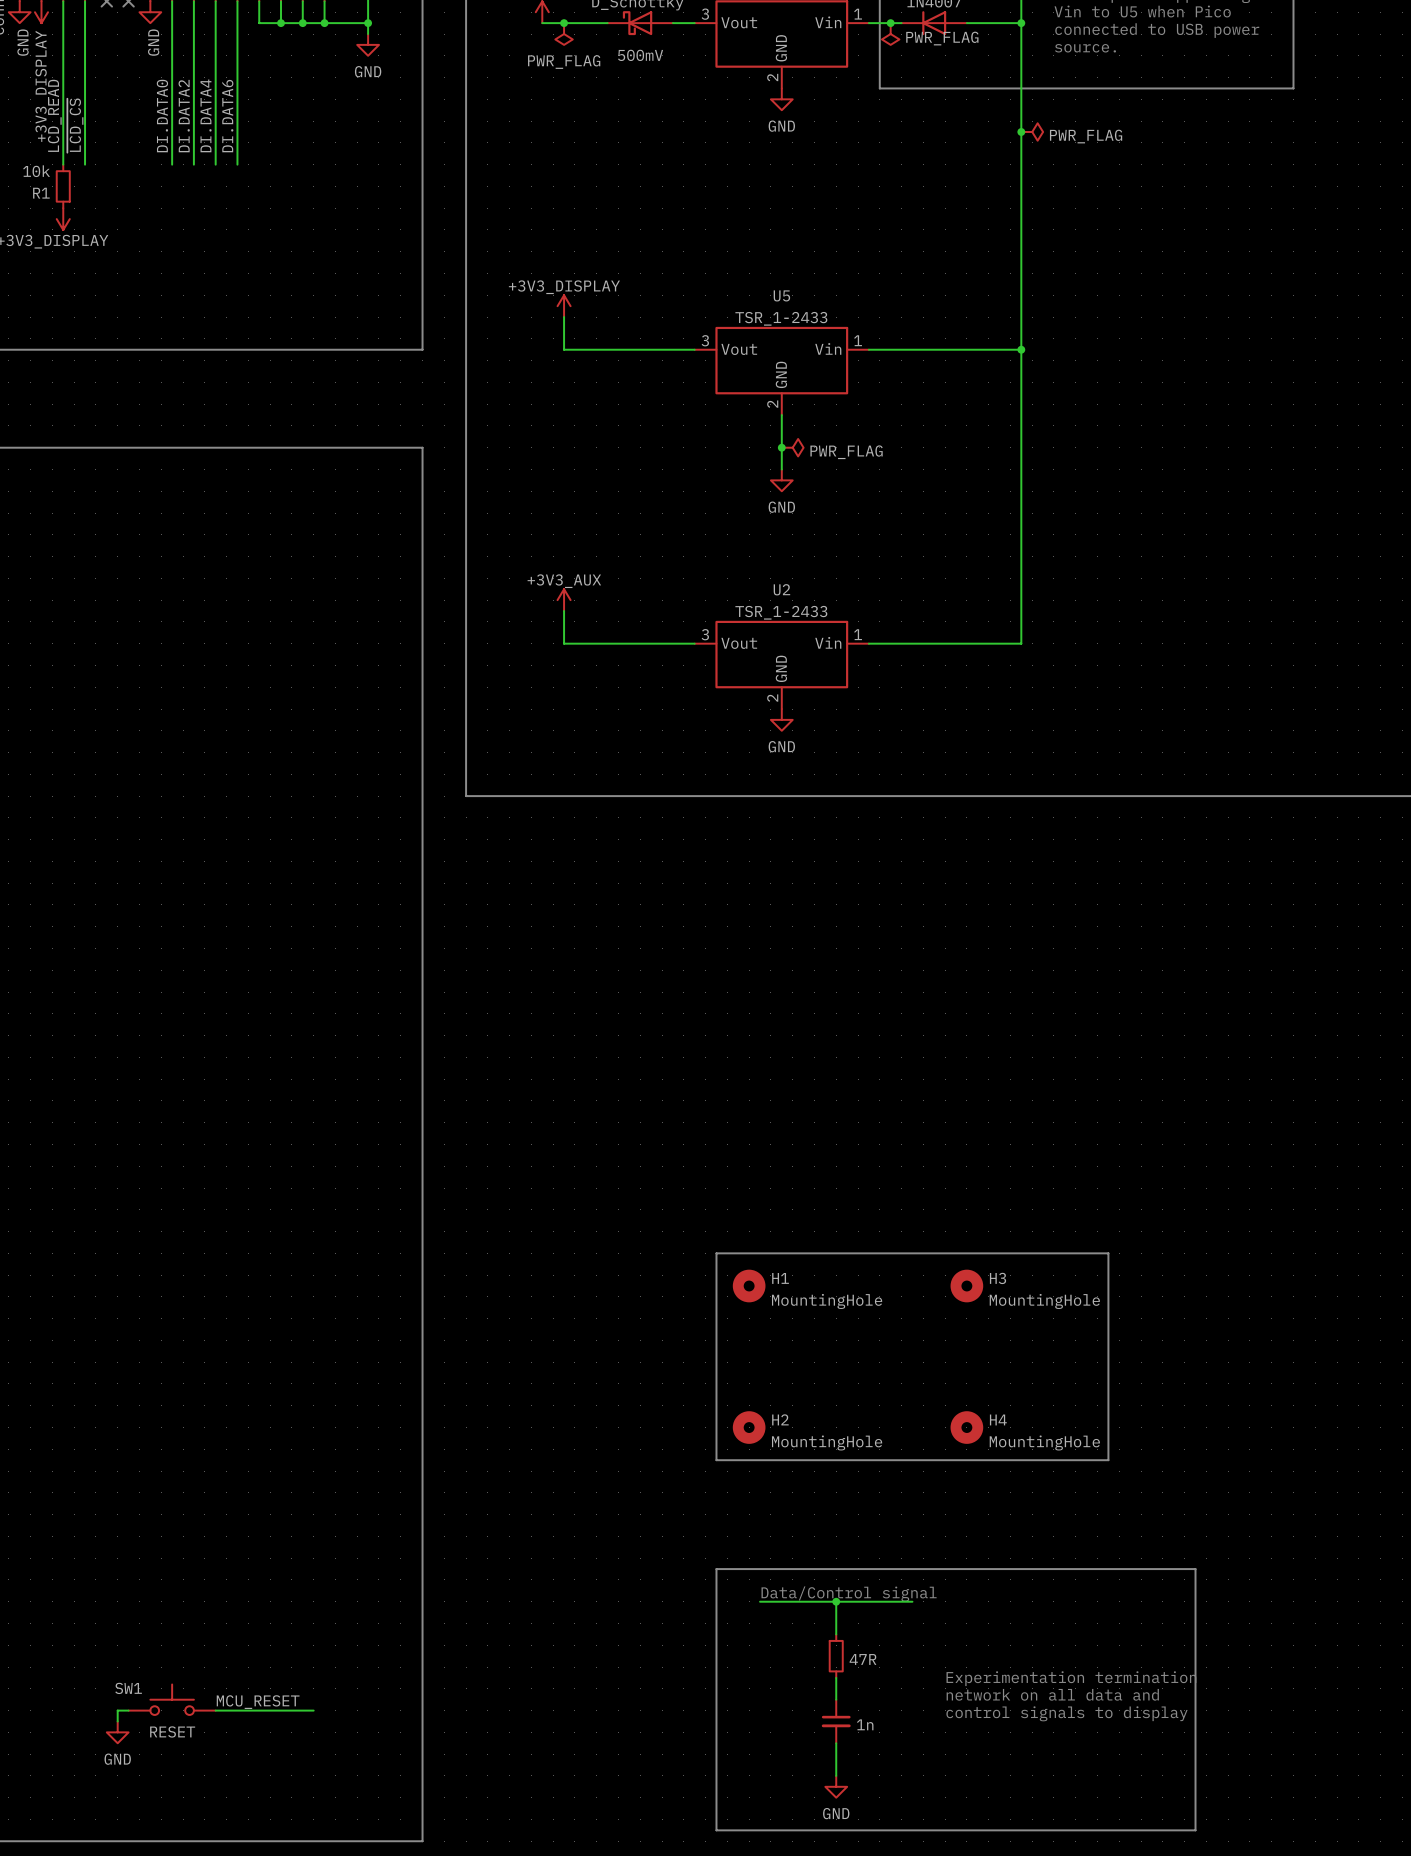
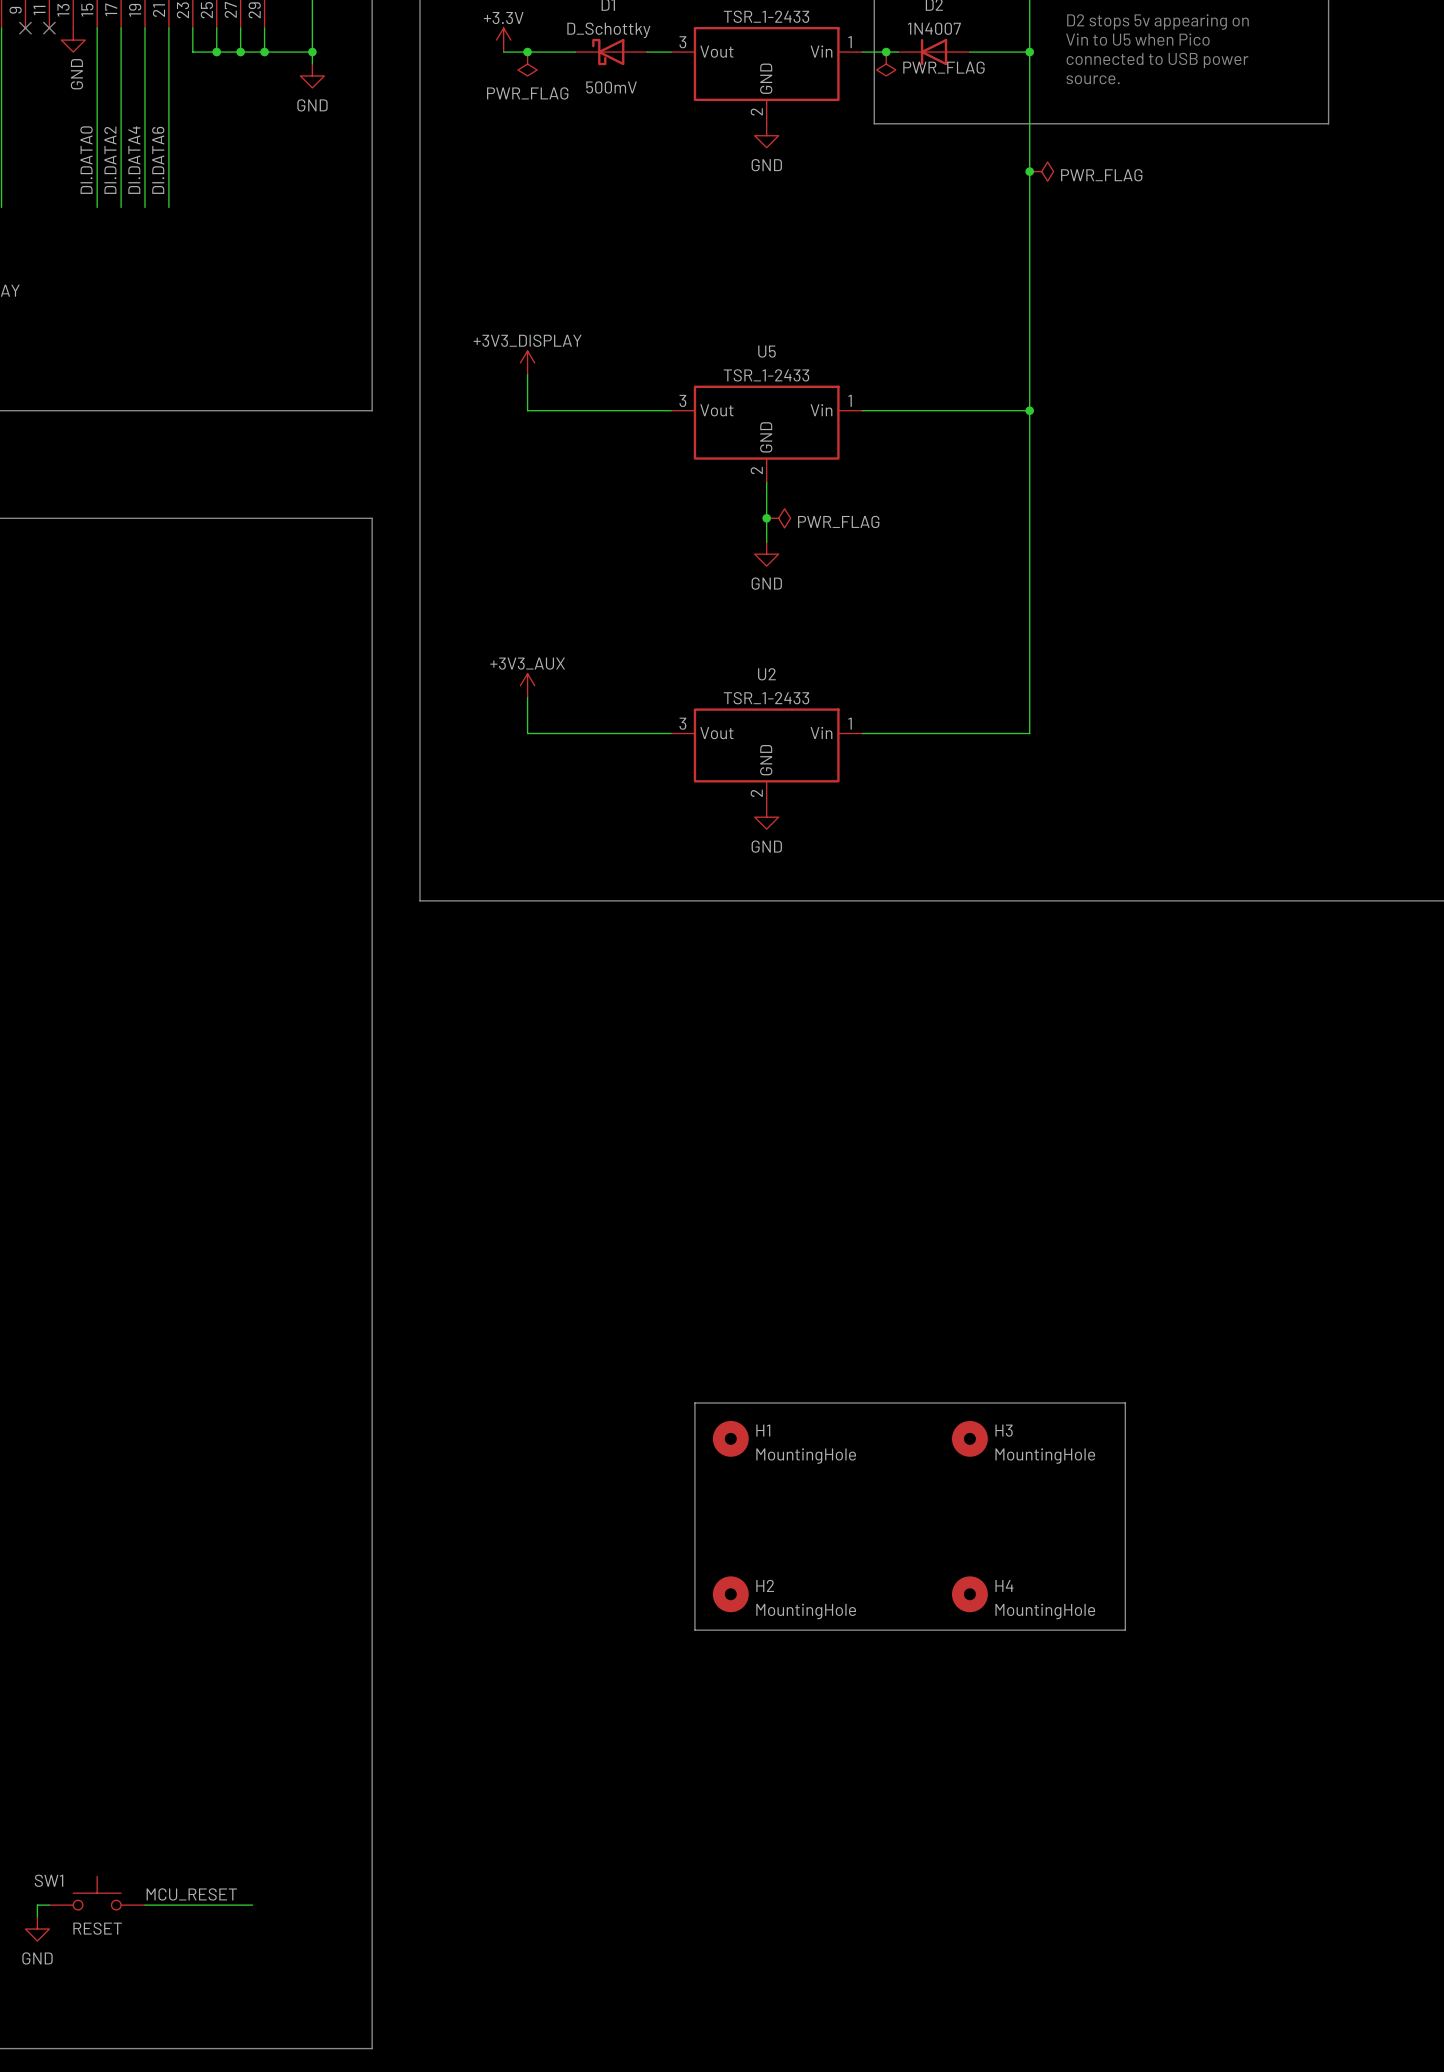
line: (716, 1569) (1195, 1569) (1195, 1830) (716, 1830) (716, 1569) -> none
text: Data/Control signal (849, 1593) -> none
wire: (760, 1601) (912, 1601) -> none
wire: (836, 1601) (836, 1634) -> none
junction: (836, 1601) -> none
power symbol: 47R (836, 1656) -> none
wire: (836, 1677) (836, 1699) -> none
text: Experimentation termination (1071, 1678) -> none
text: network on all data and (1052, 1694) -> none
text: control signals to display (1067, 1713) -> none
power symbol: 1n (836, 1721) -> none
wire: (836, 1743) (836, 1775) -> none
power symbol: GND (836, 1786) -> none

